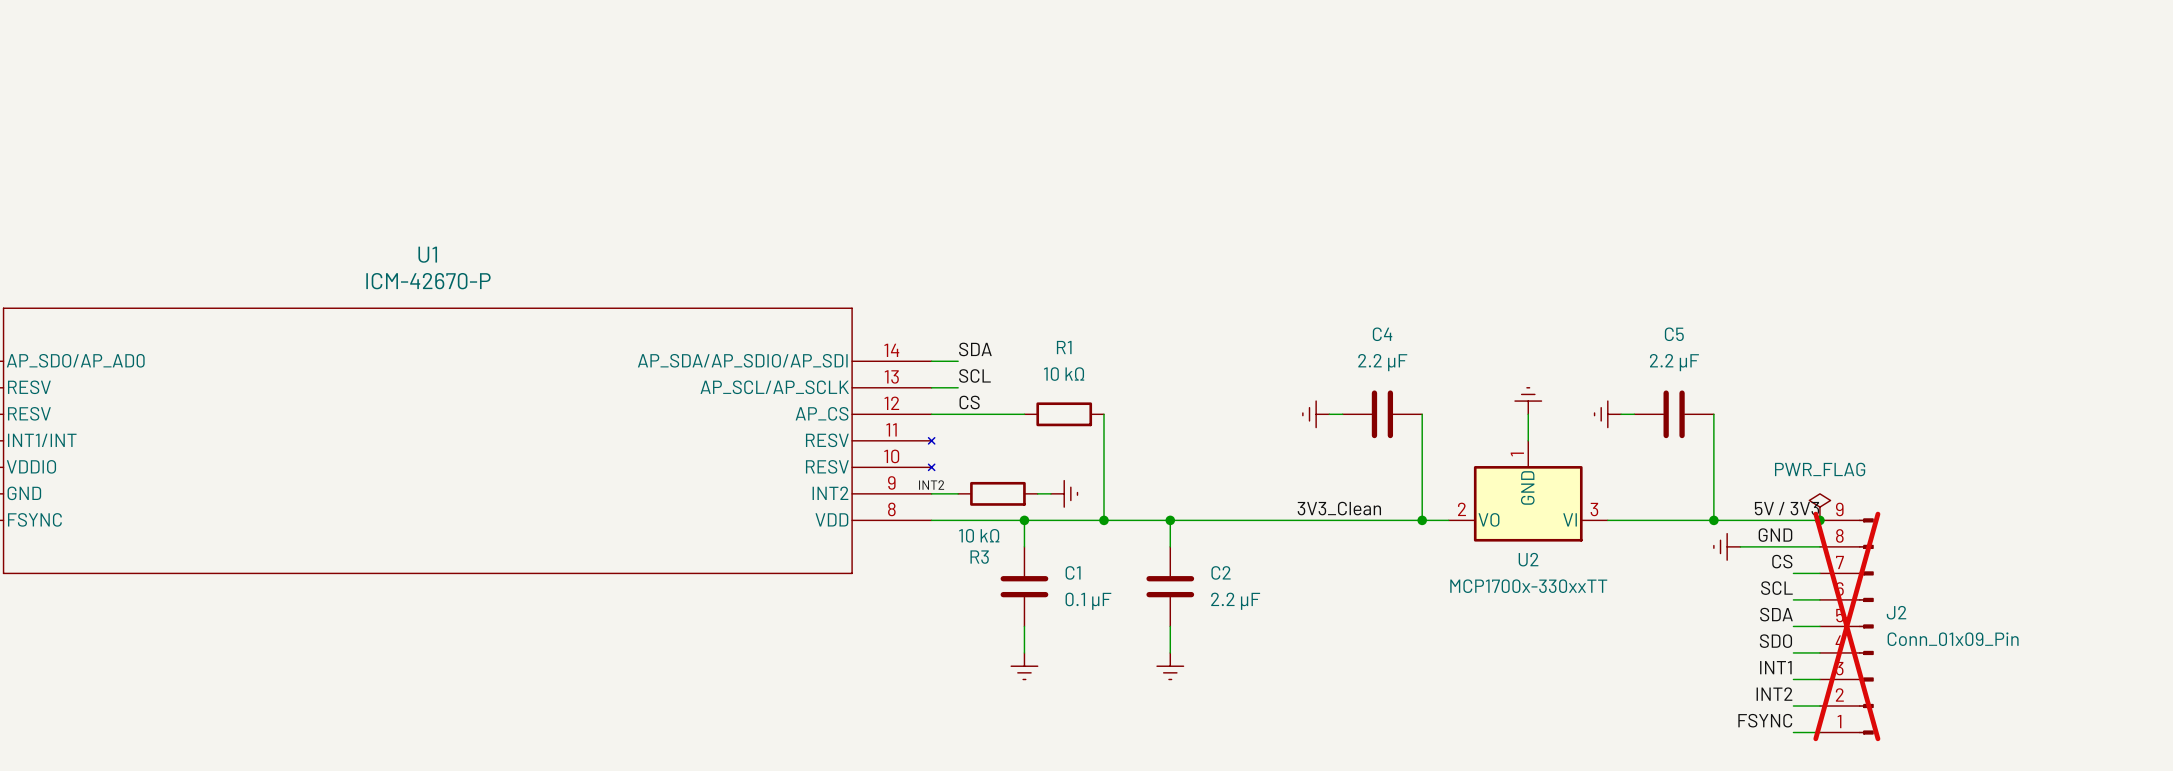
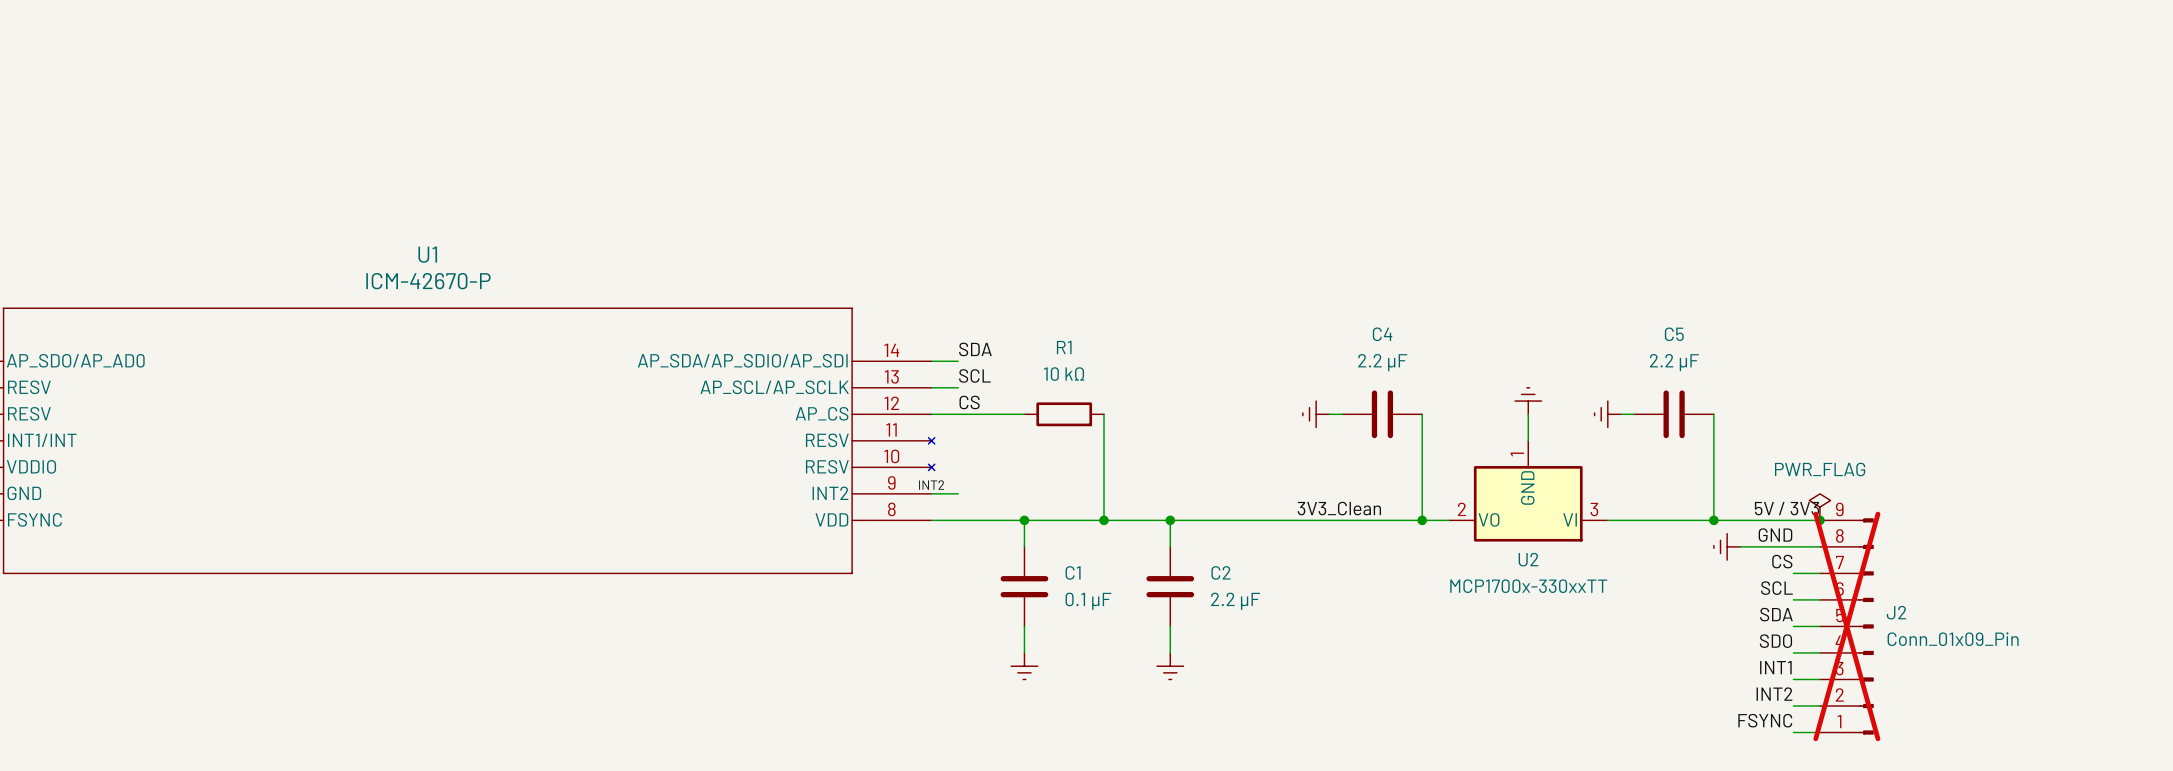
R3: 10 kΩ (997, 493) -> none
wire: (1037, 493) (1050, 493) -> none
power symbol: (1064, 493) -> none

